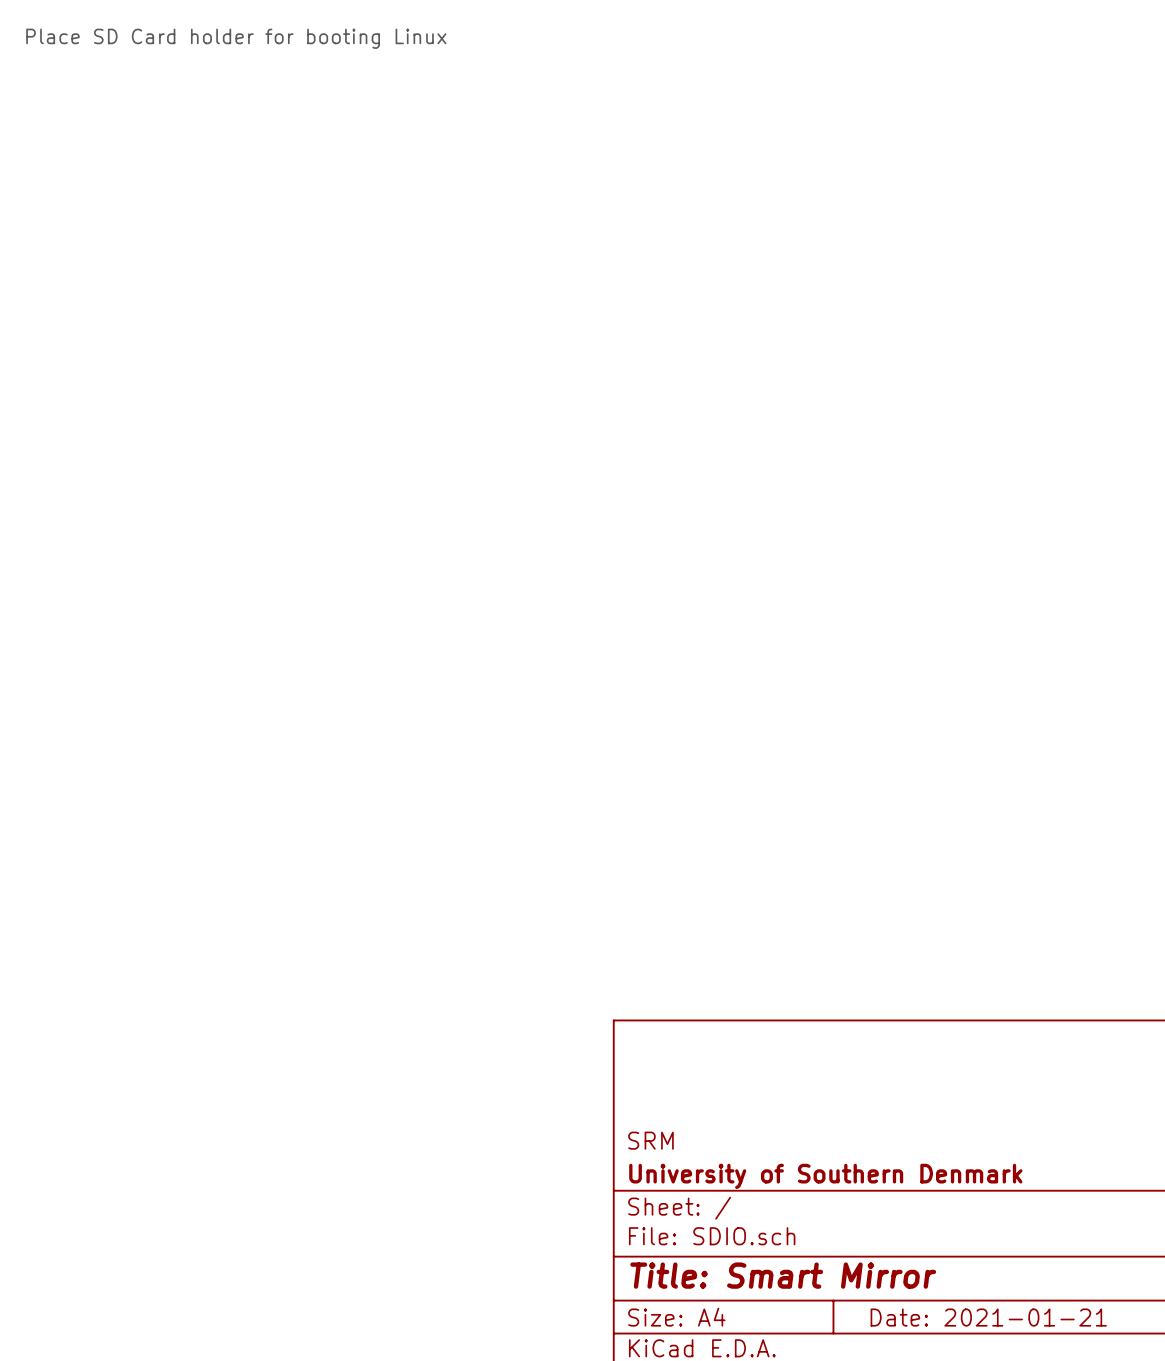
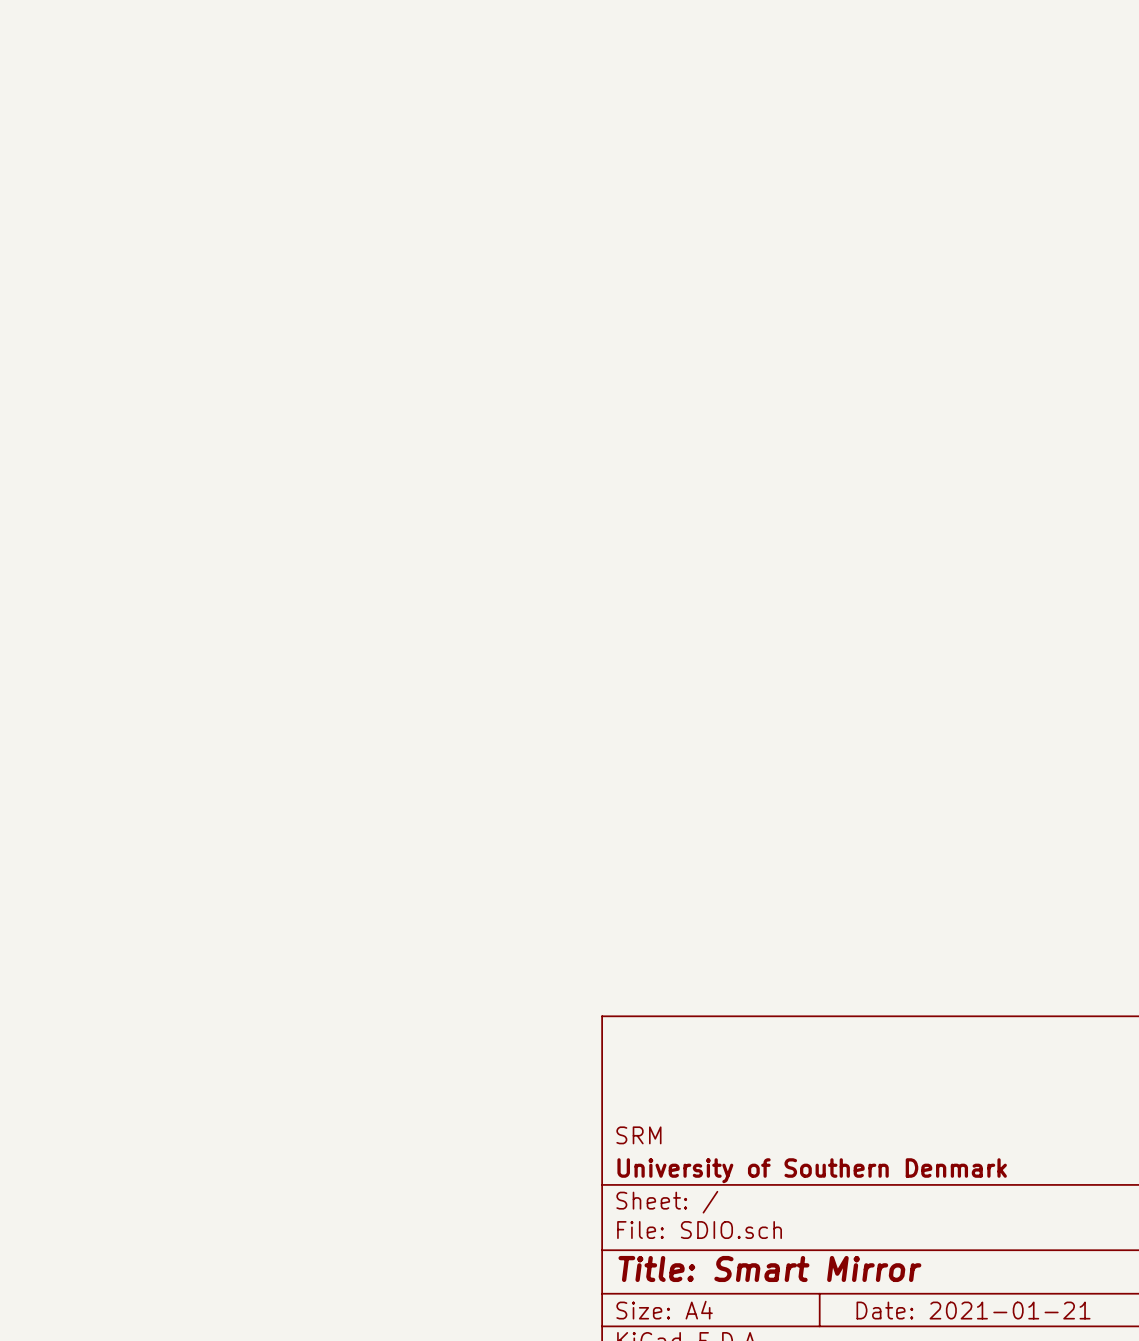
text: Place SD Card holder for booting Linux (236, 38) -> none

